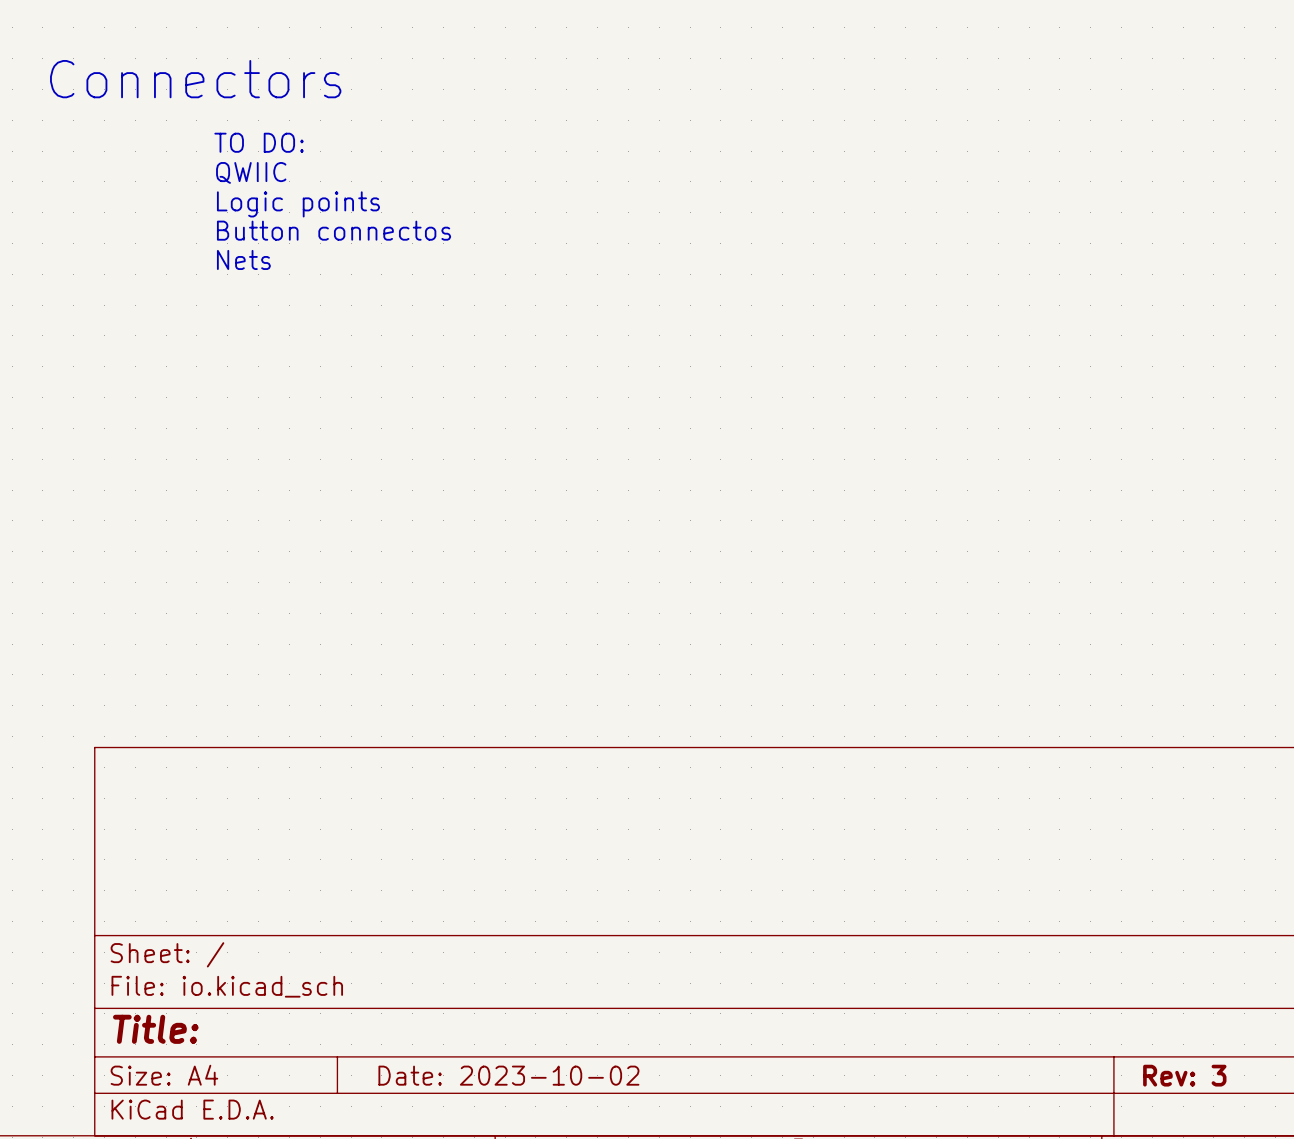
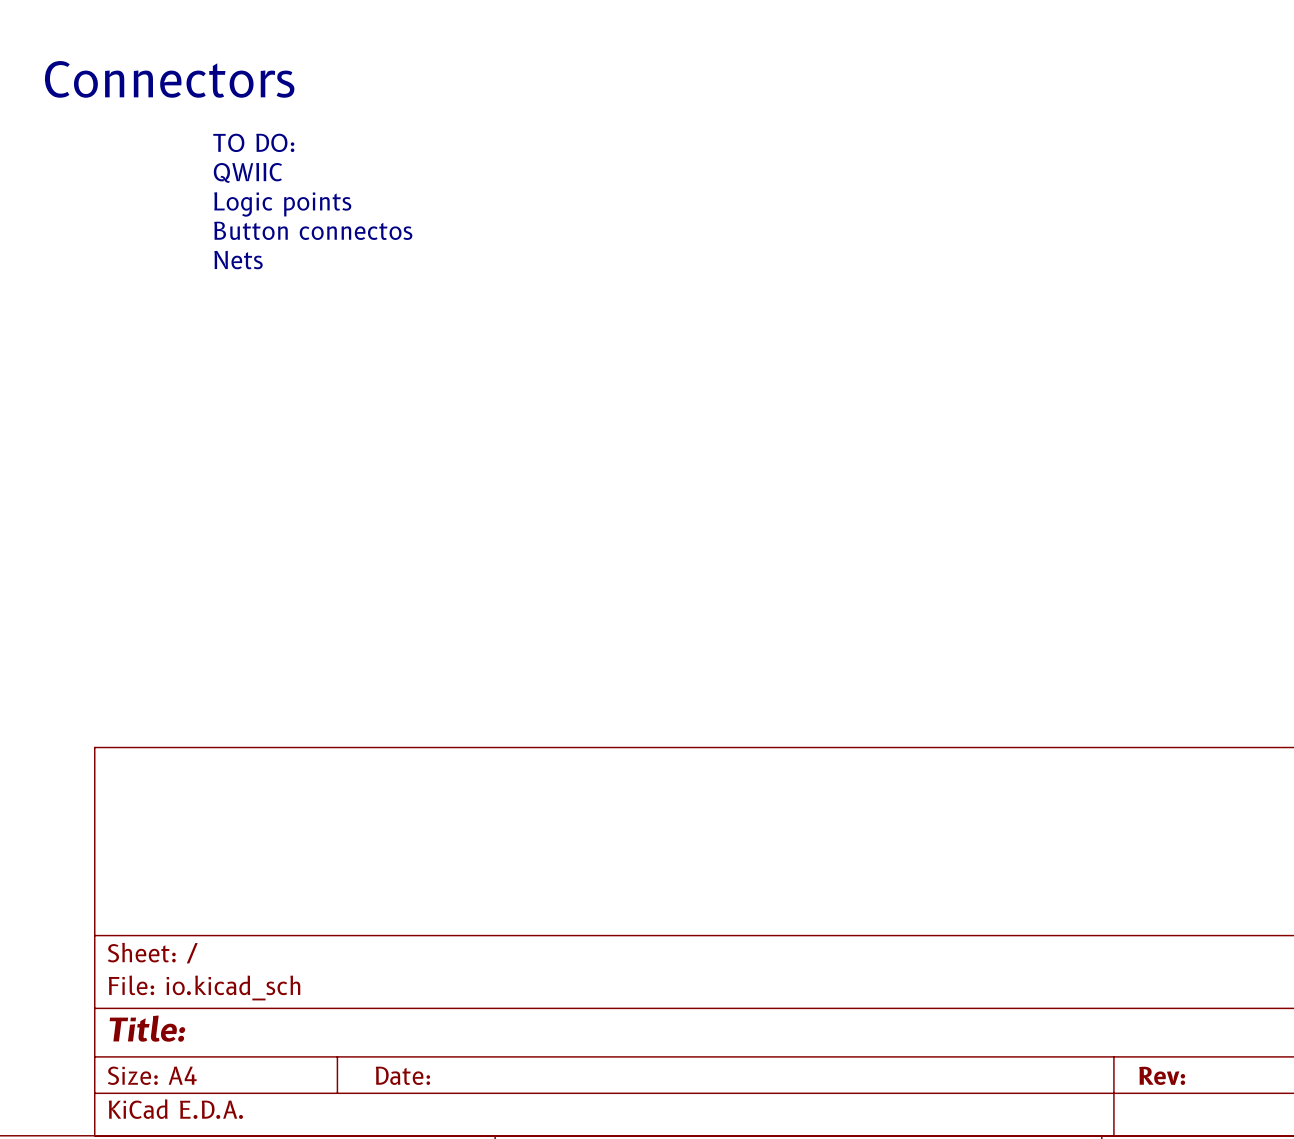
title block: Date: 2023-10-02 (508, 1075) -> Date: (402, 1075)
title block: Rev: 3 (1184, 1075) -> Rev: (1162, 1075)

